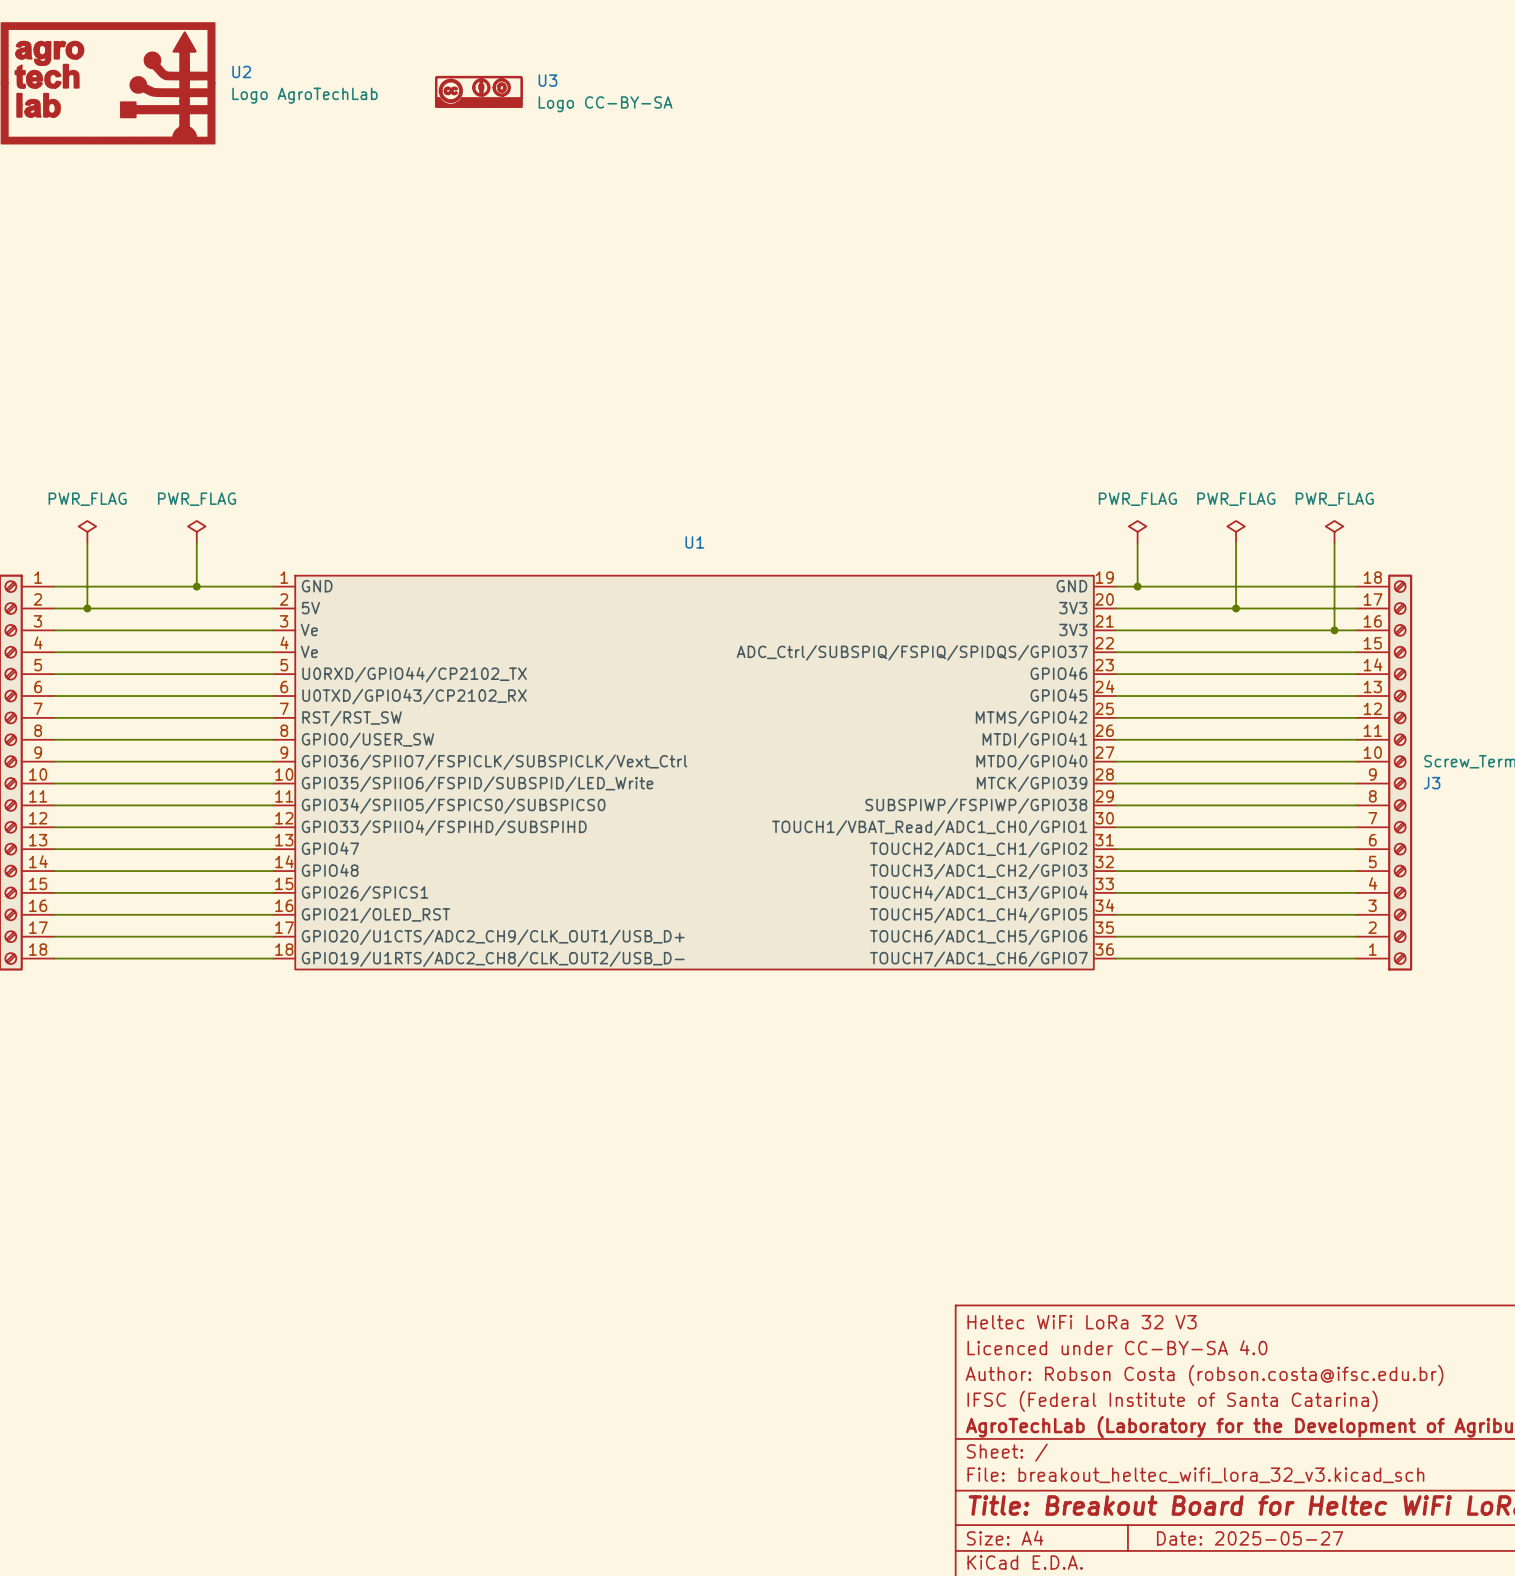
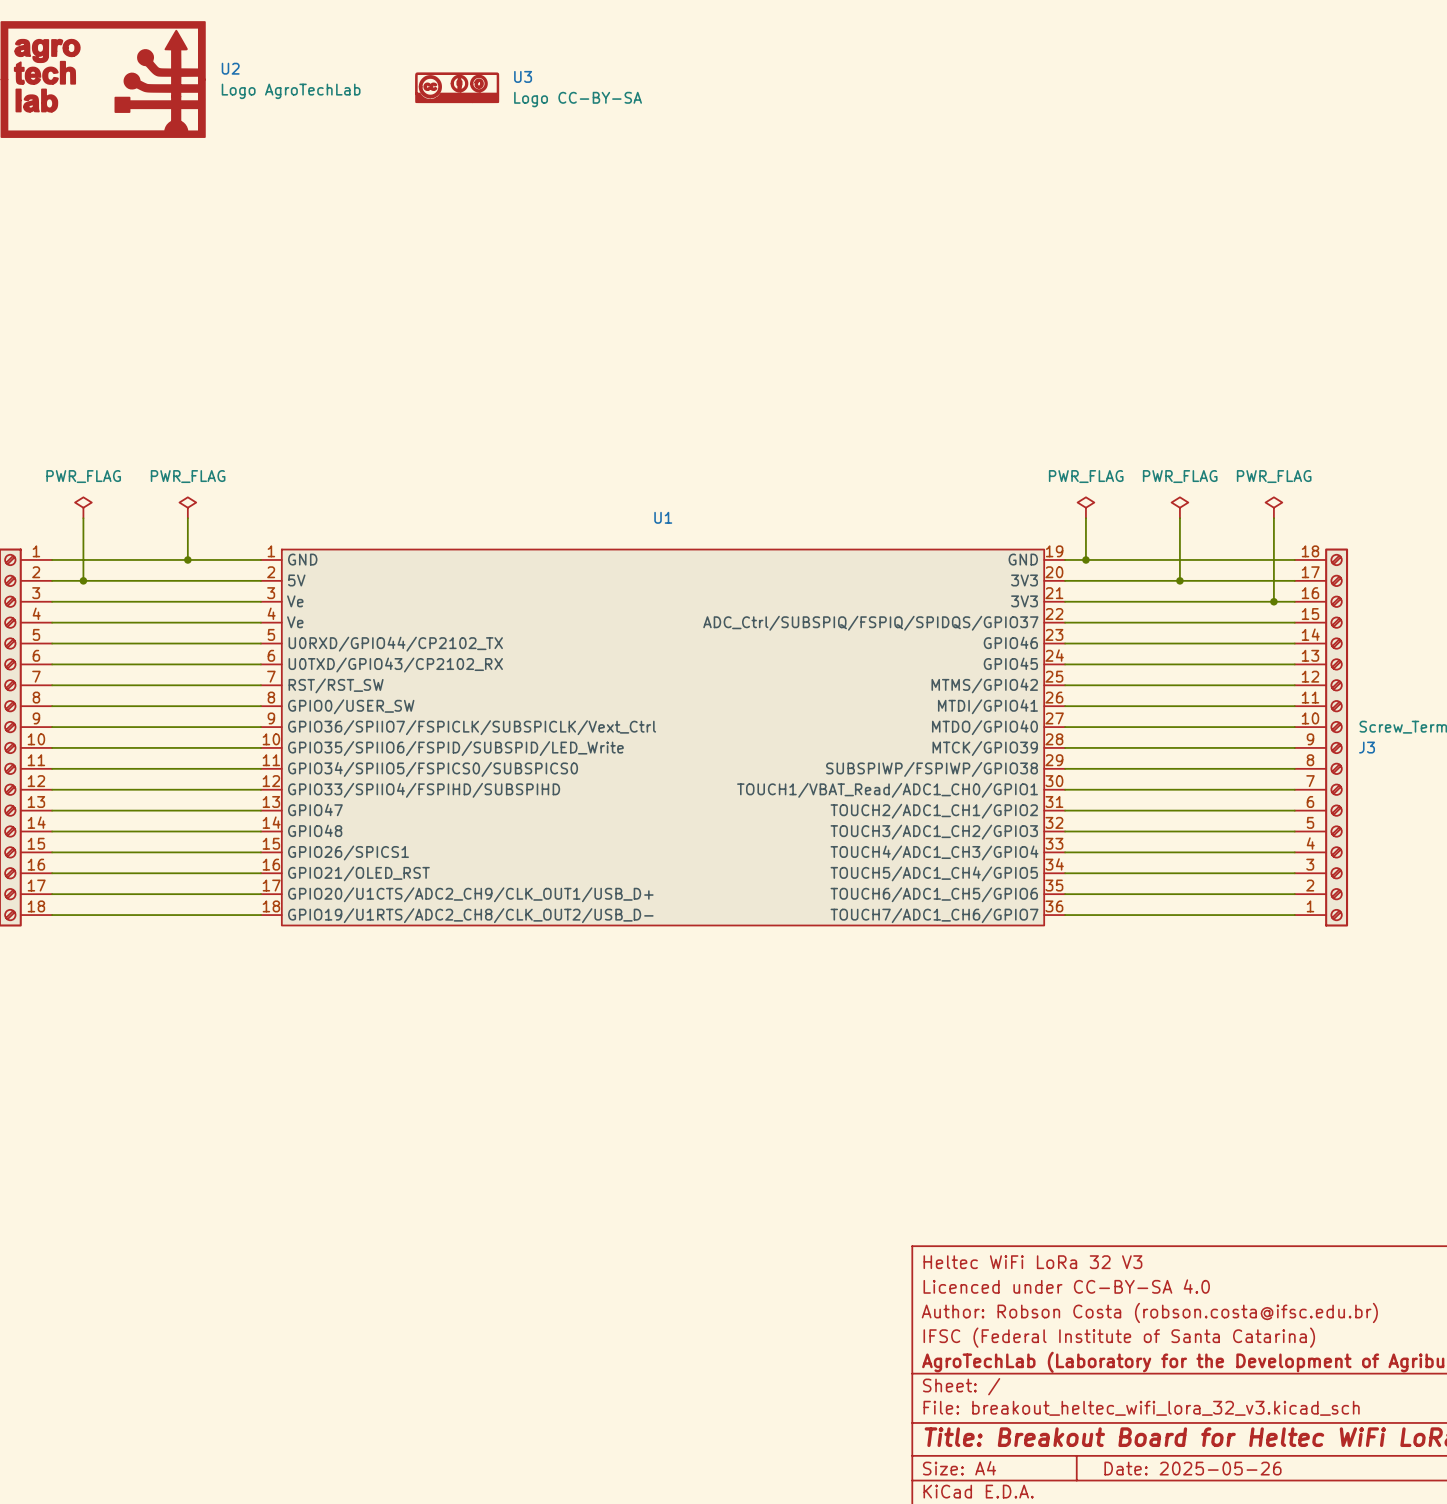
title block: Date: 2025-05-27 (1250, 1538) -> Date: 2025-05-26 (1192, 1468)

